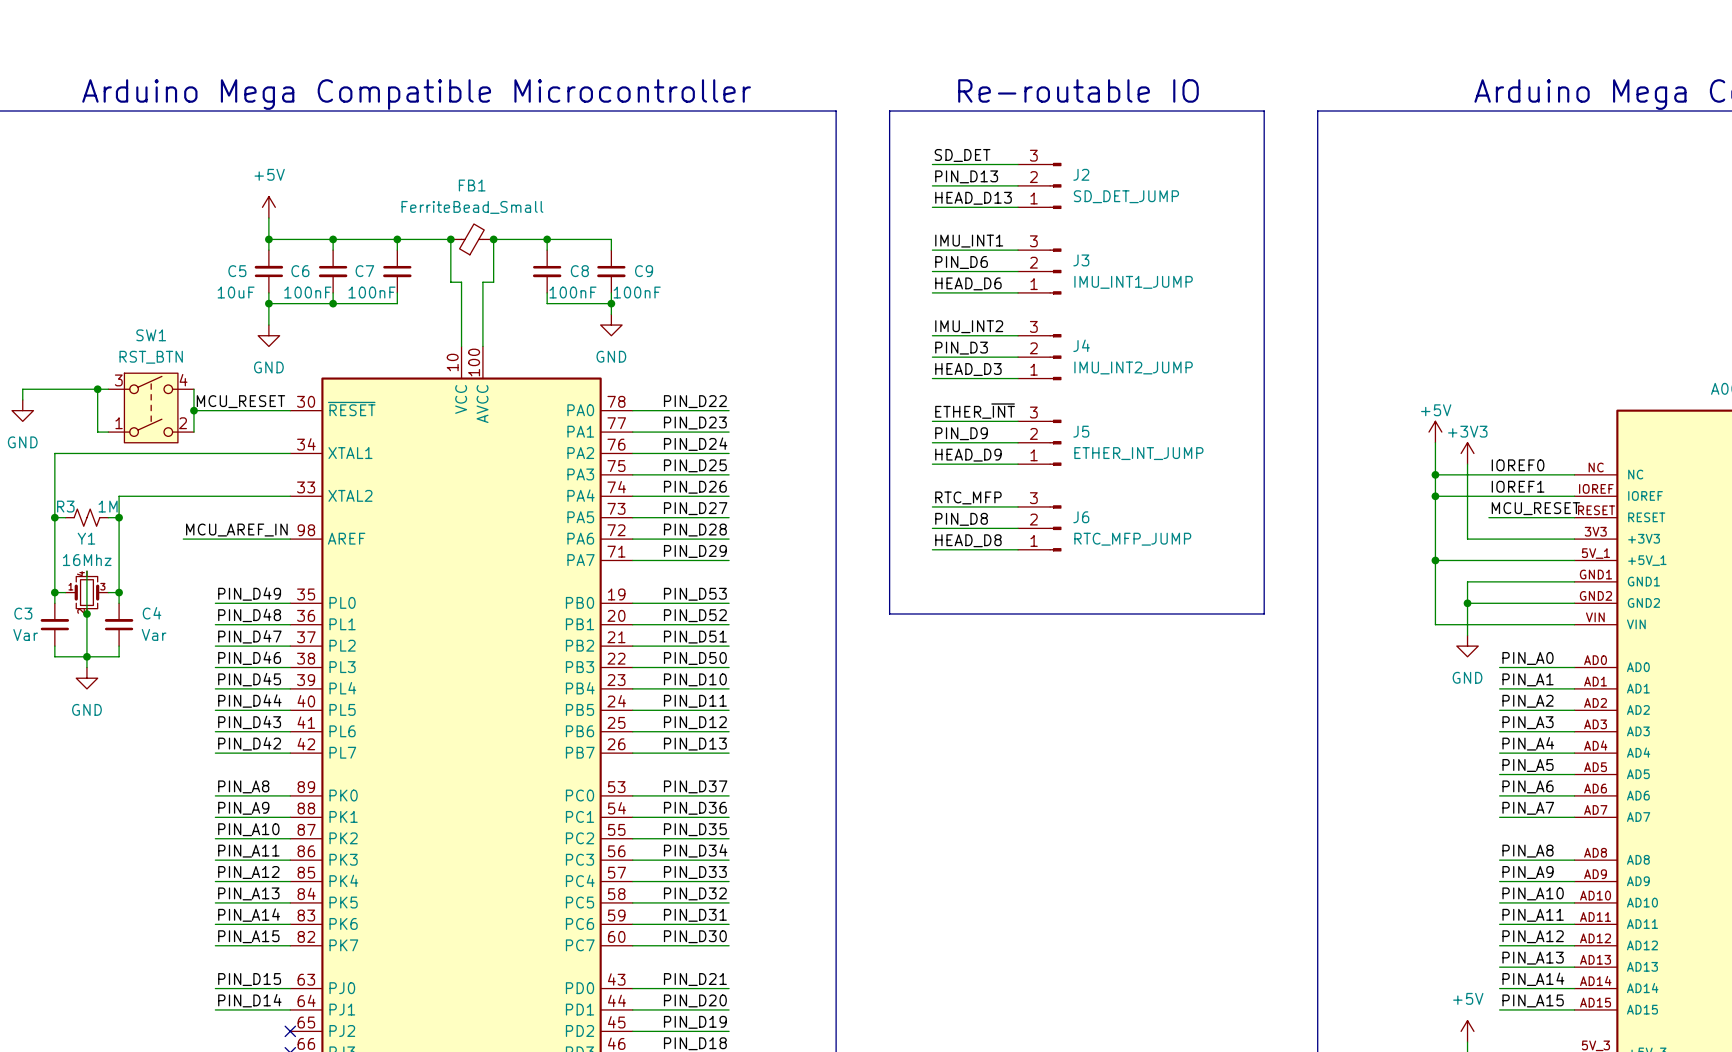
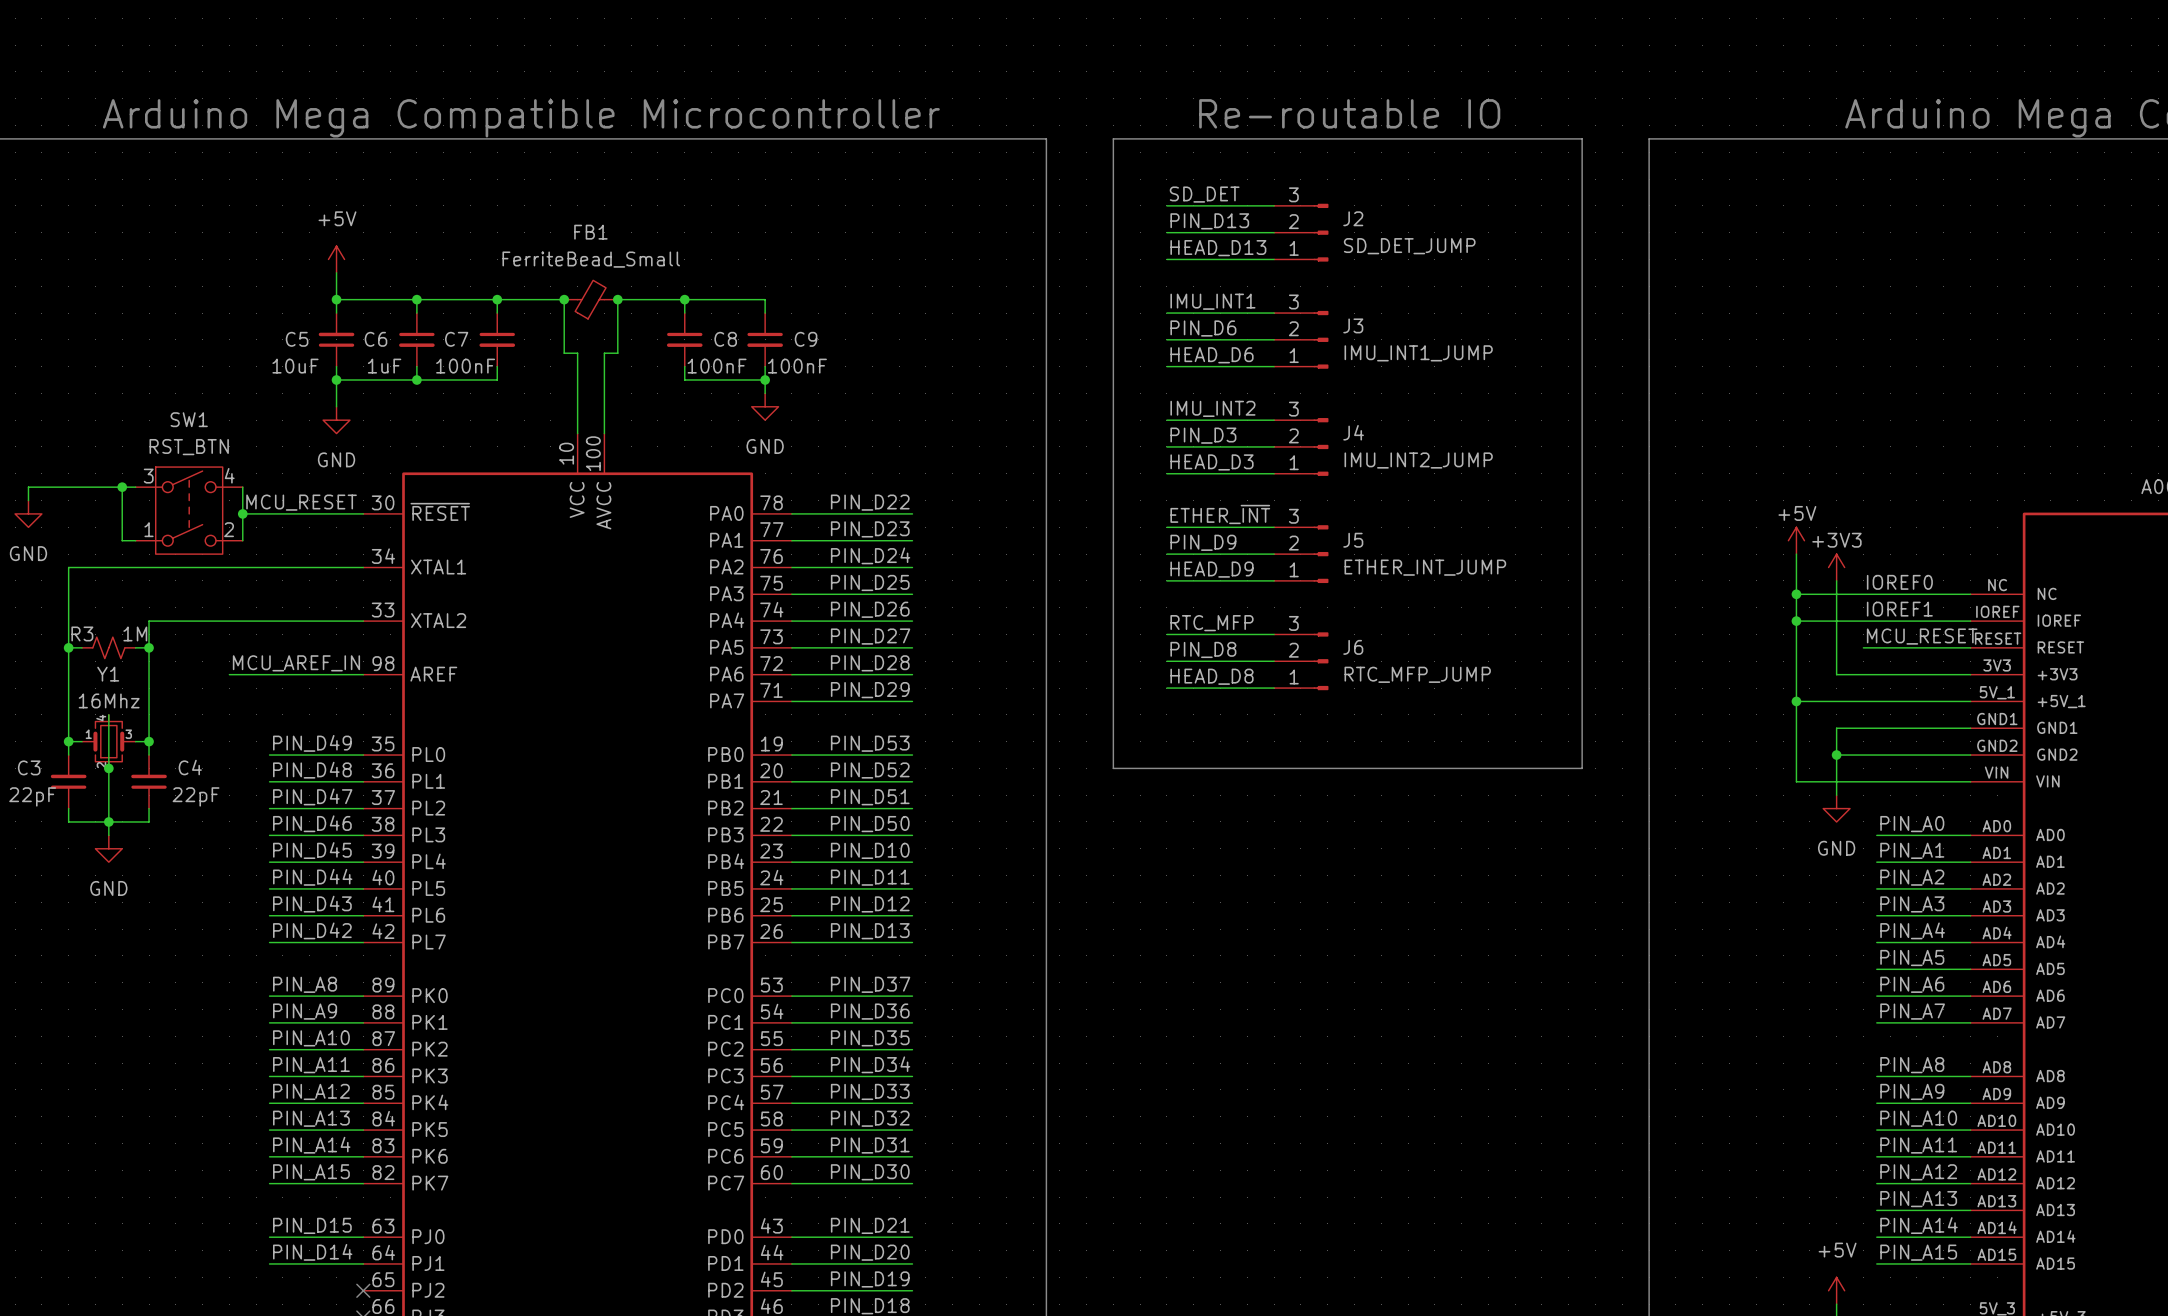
C6 value: 100nF (307, 292) -> 1uF (384, 366)
C4 value: Var (154, 634) -> 22pF (196, 796)
C3 value: Var (25, 635) -> 22pF (32, 796)

